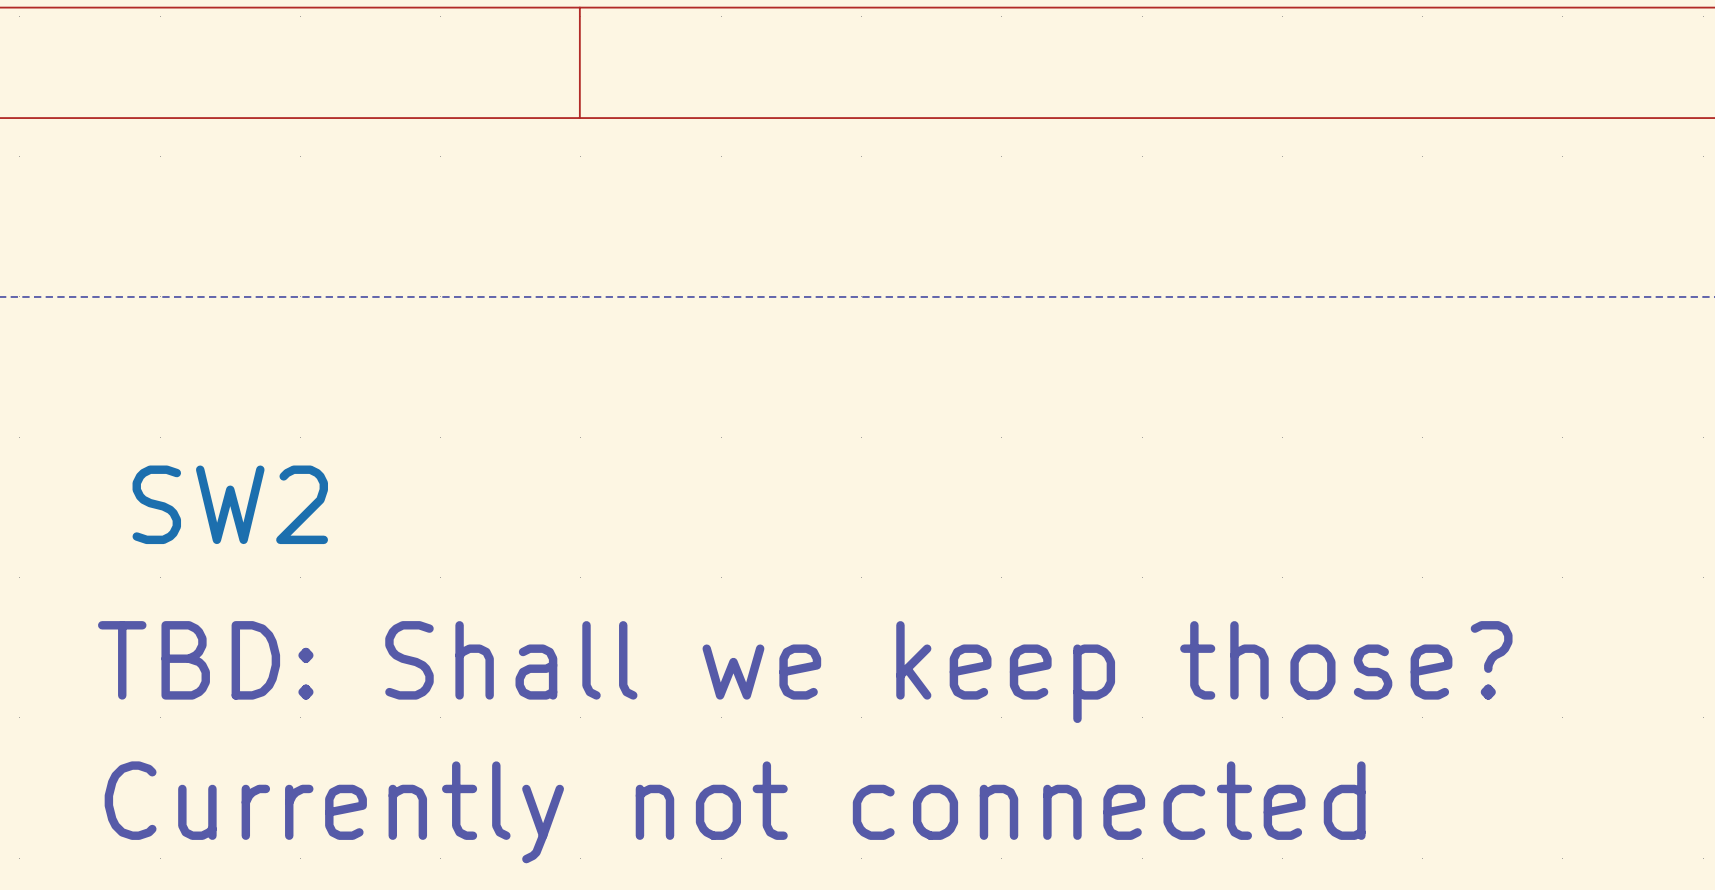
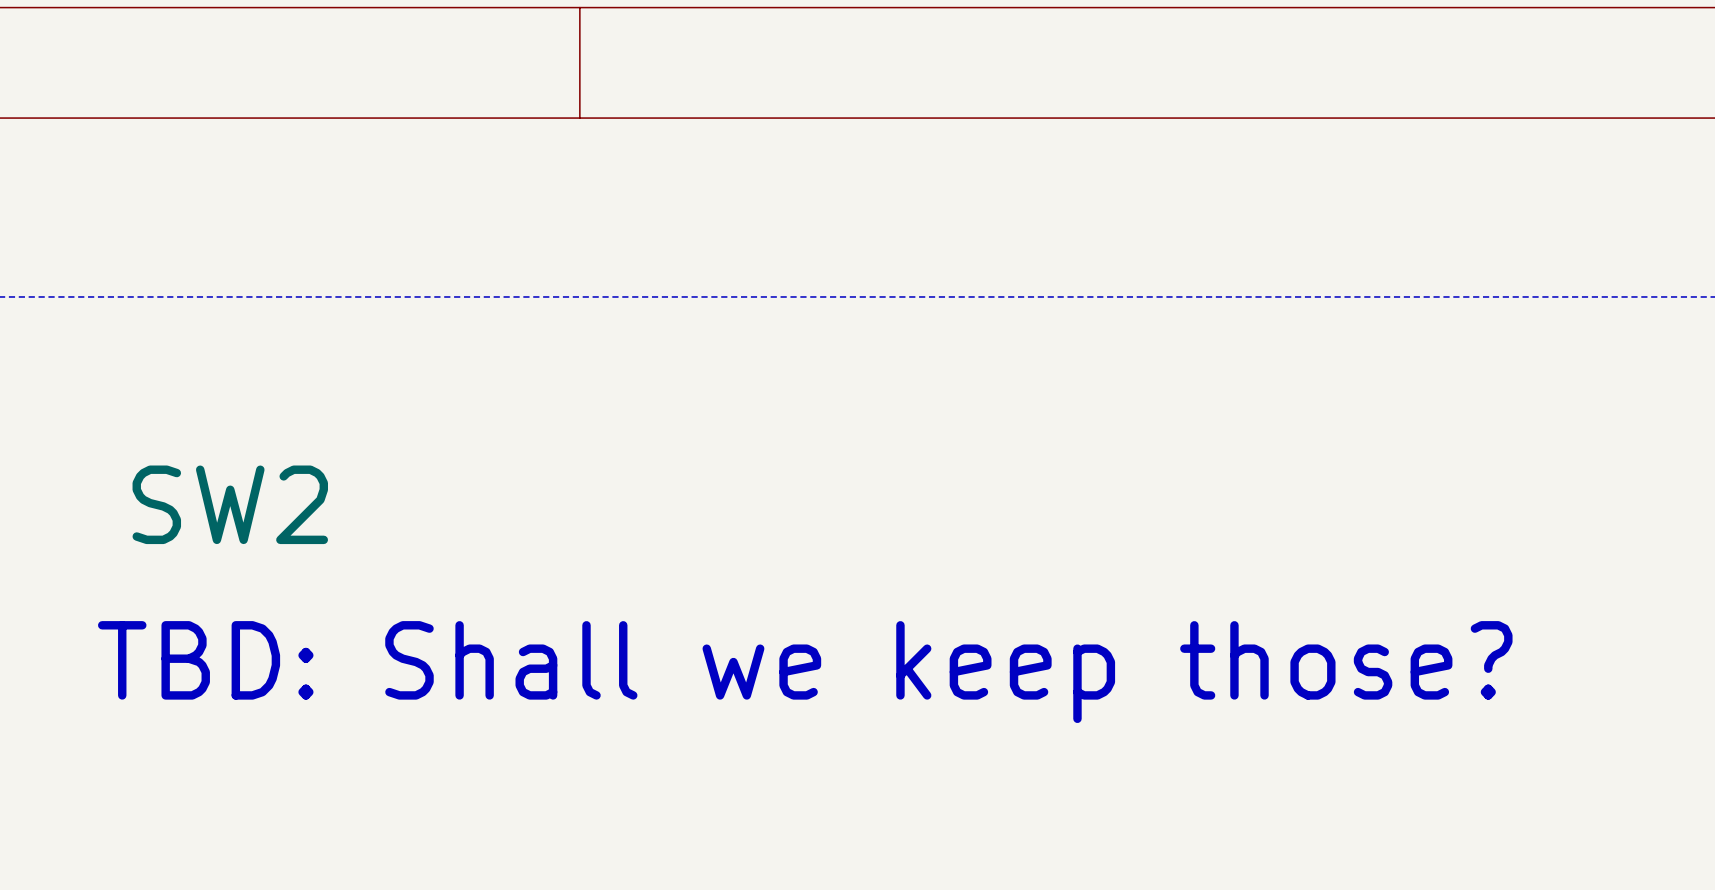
text: Currently not connected (735, 812) -> none

